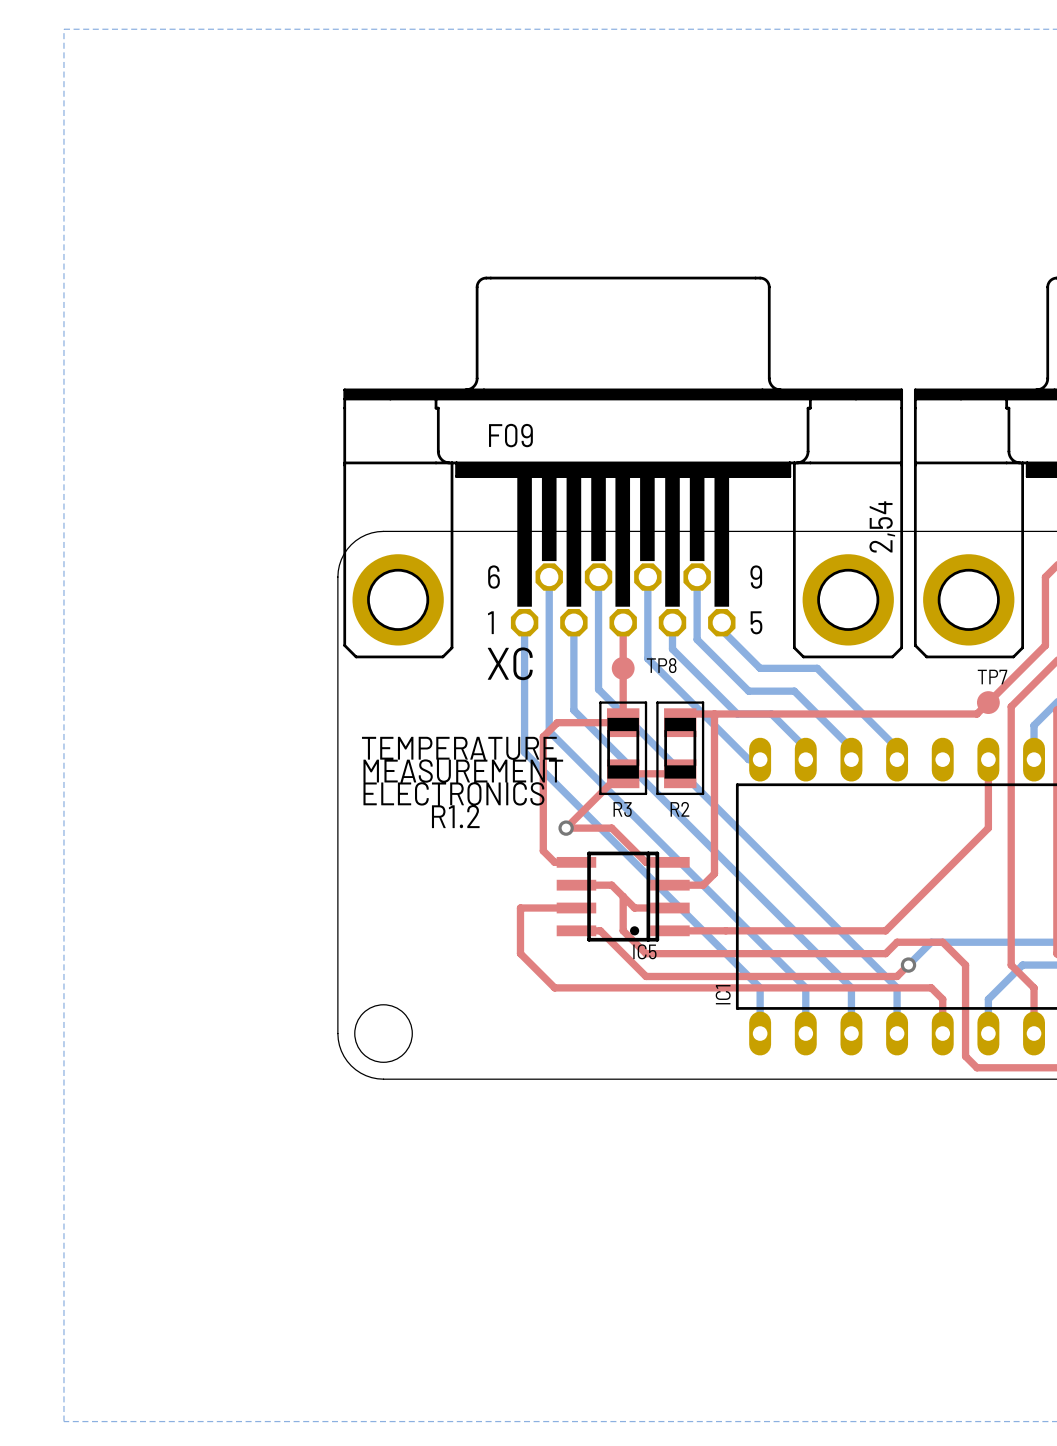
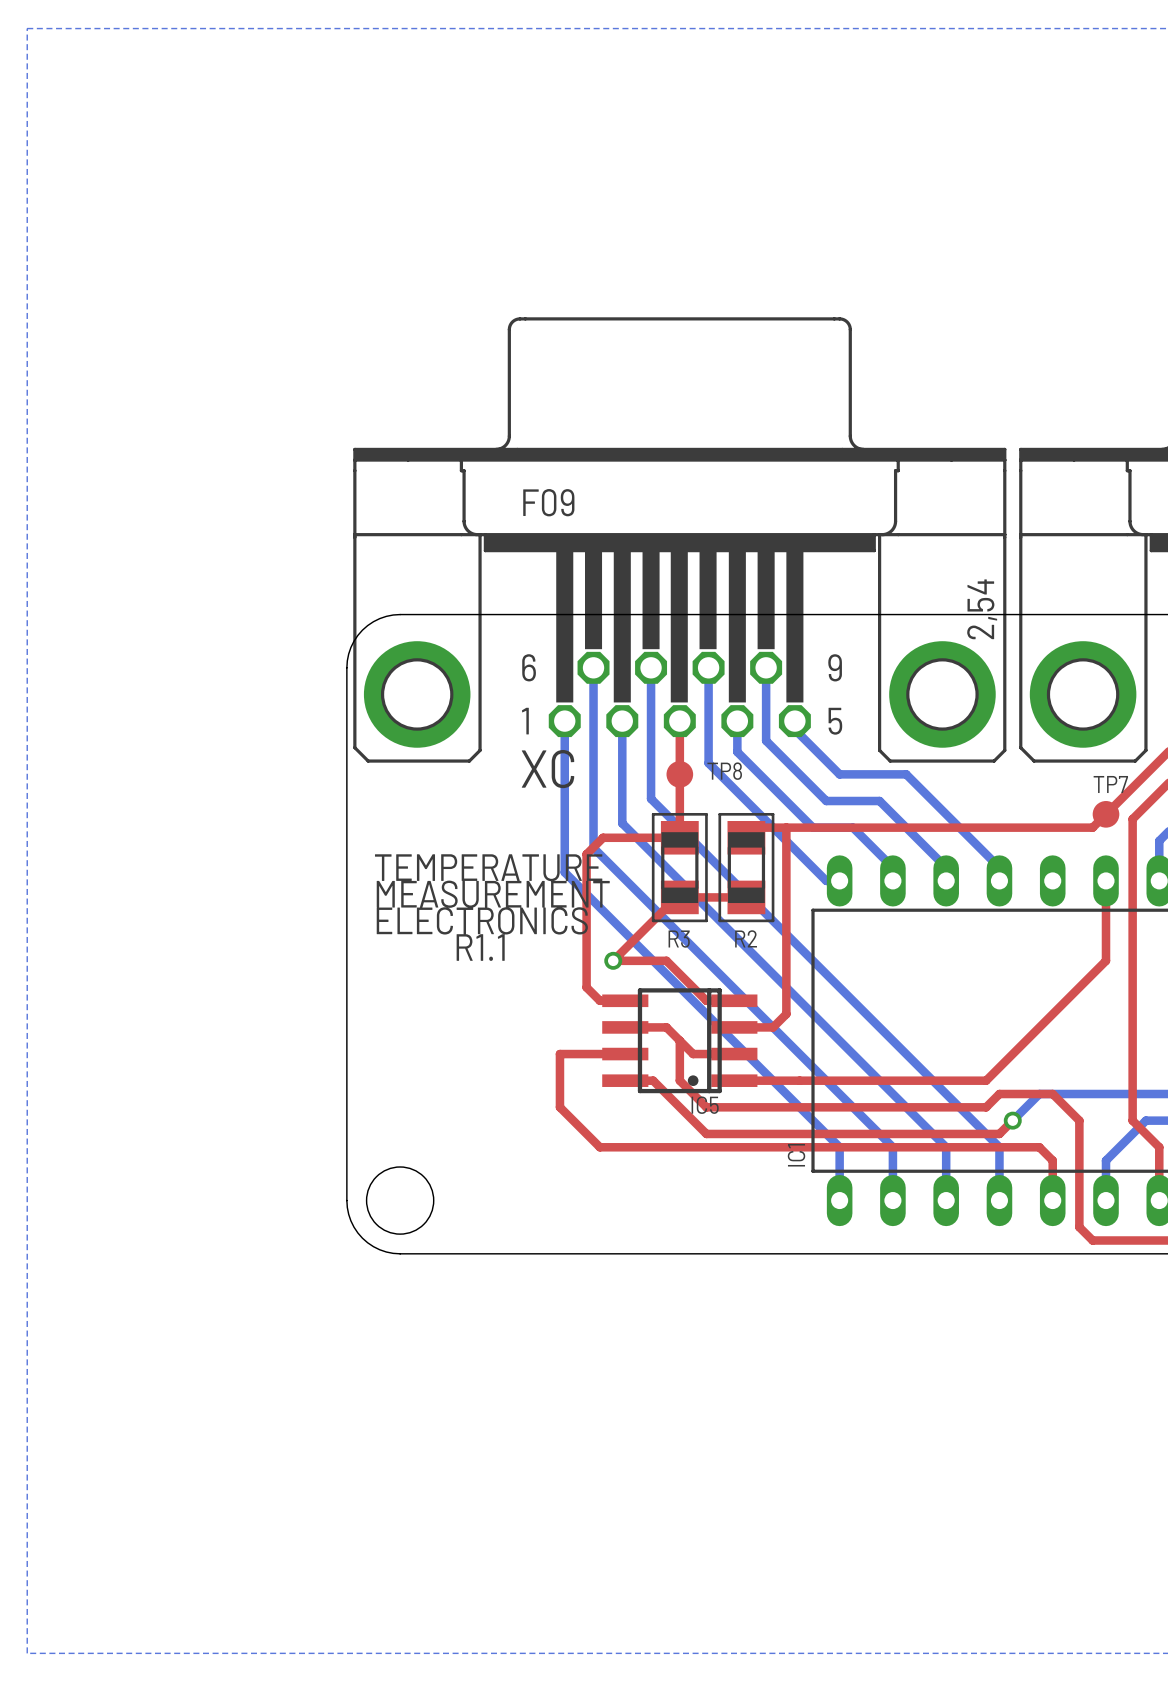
text: R1.2 (455, 816) -> R1.1 (480, 947)

